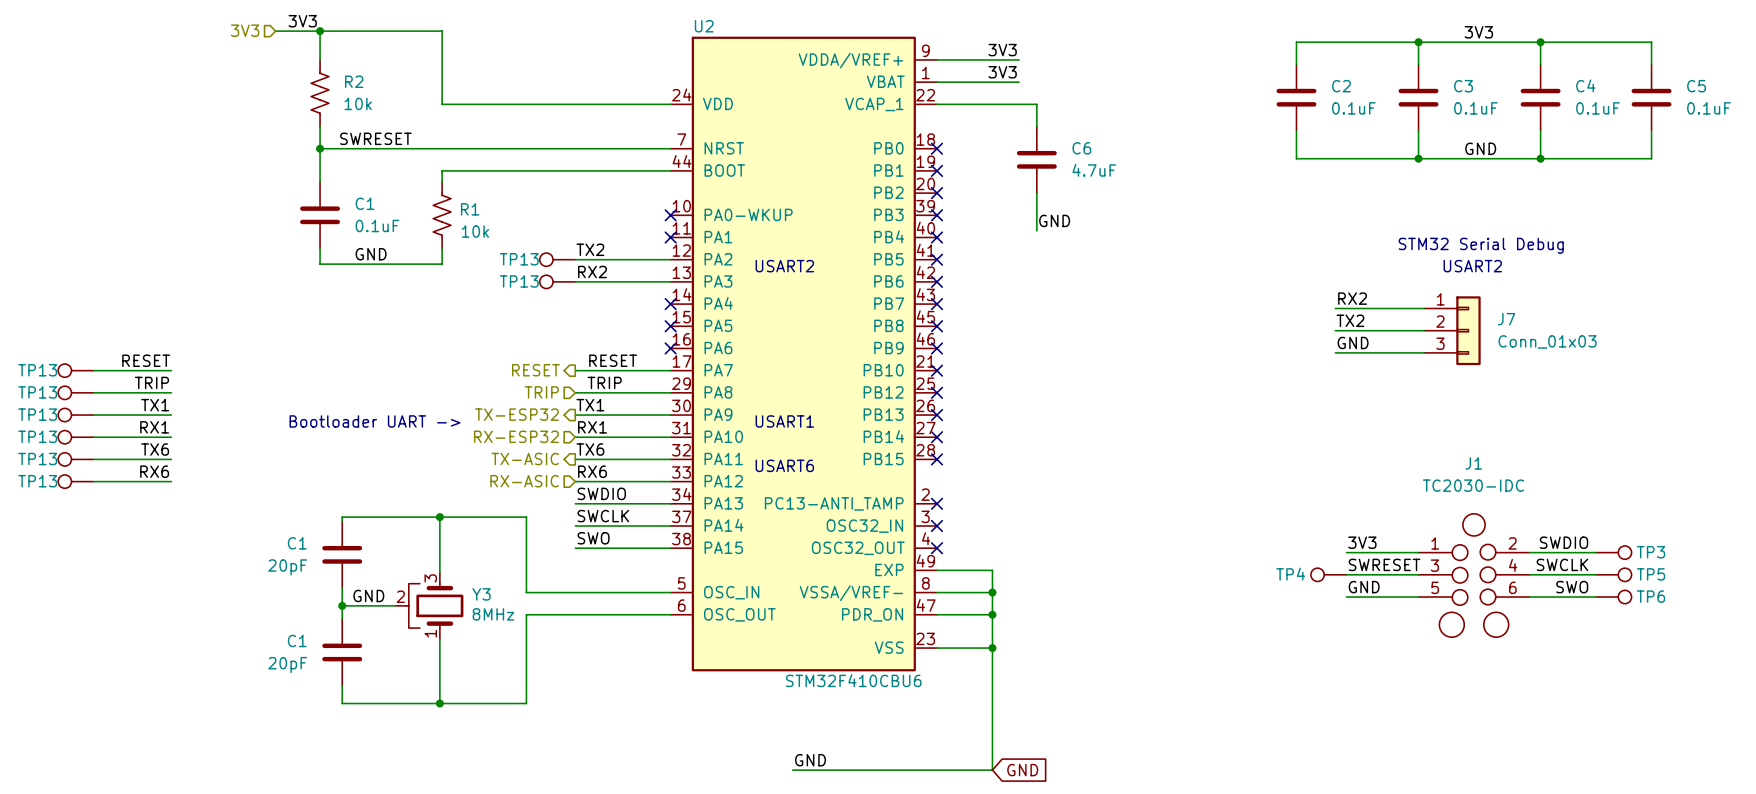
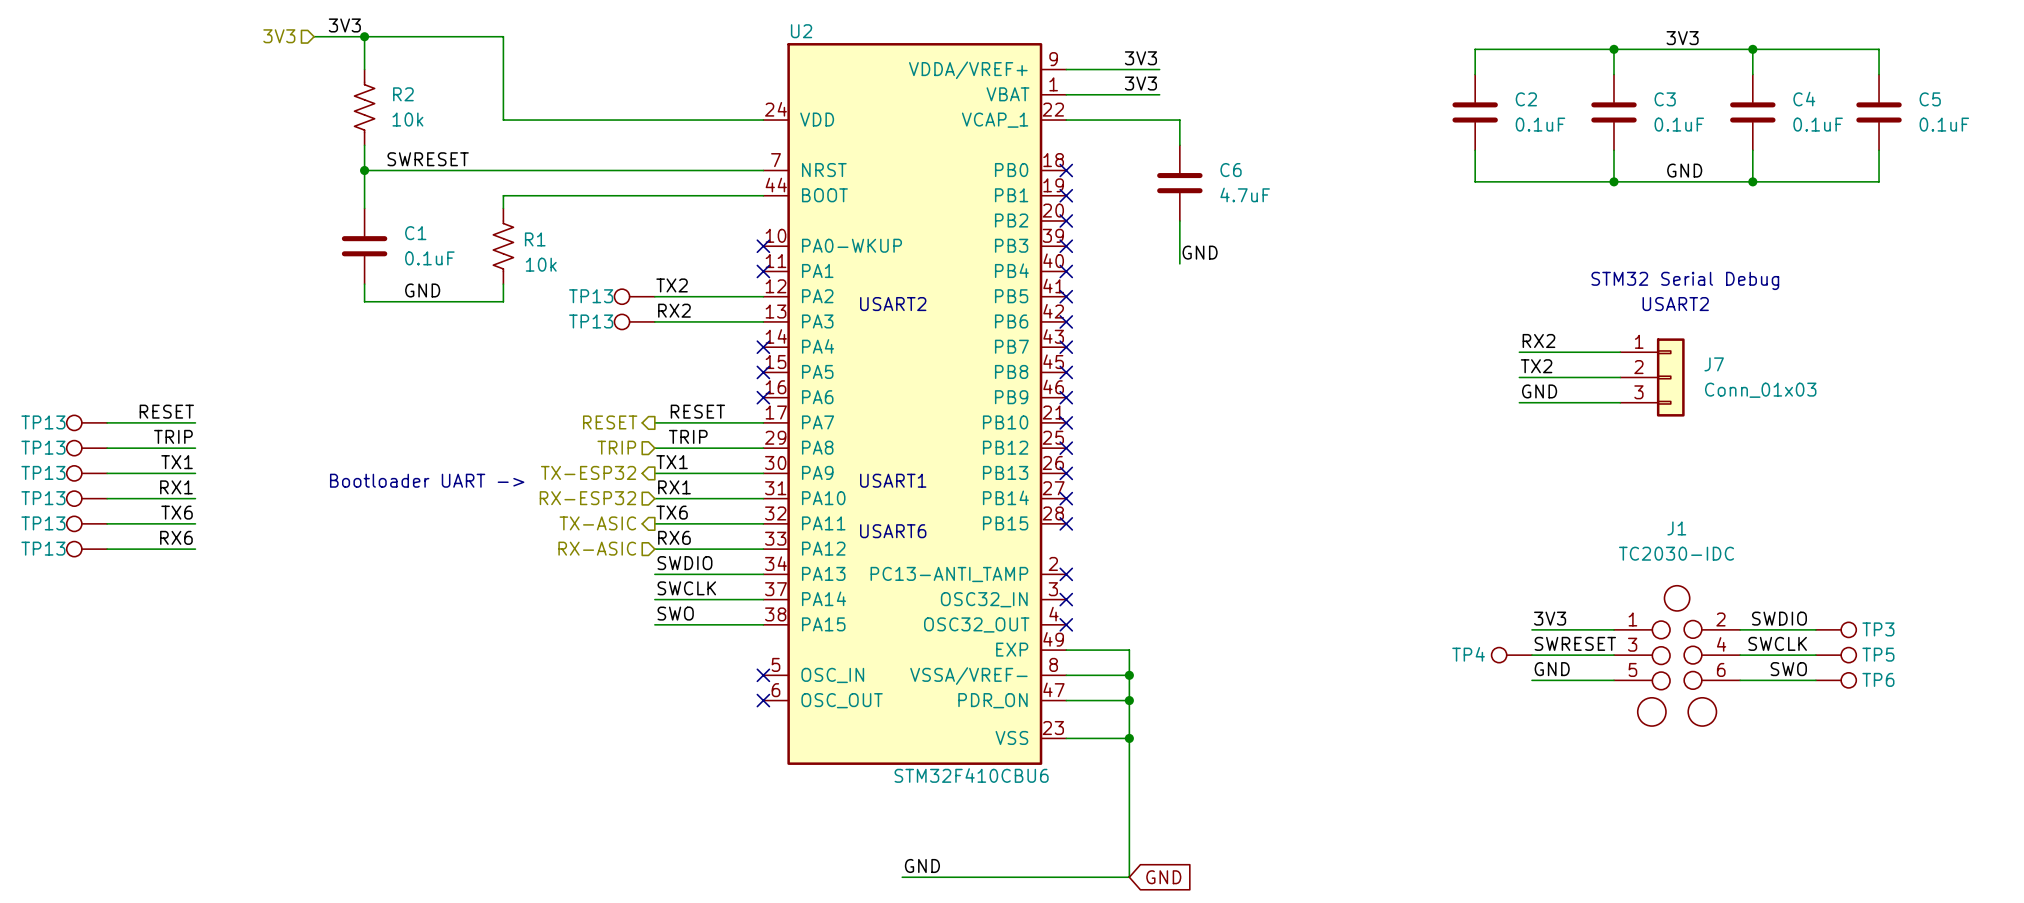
wire: (439, 517) (439, 572) -> none
junction: (439, 517) -> none
wire: (342, 521) (342, 517) (526, 517) (526, 592) (670, 592) -> none
C1: 20pF (342, 554) -> none
wire: (342, 588) (342, 619) -> none
no-connect mark: none -> (763, 675)
label: GND (368, 595) -> none
wire: (342, 605) (395, 605) -> none
junction: (342, 605) -> none
Y3: 8MHz (429, 605) -> none
wire: (670, 614) (526, 614) (526, 703) (342, 703) (342, 685) -> none
no-connect mark: none -> (763, 700)
wire: (439, 639) (439, 703) -> none
C1: 20pF (342, 652) -> none
junction: (439, 703) -> none

